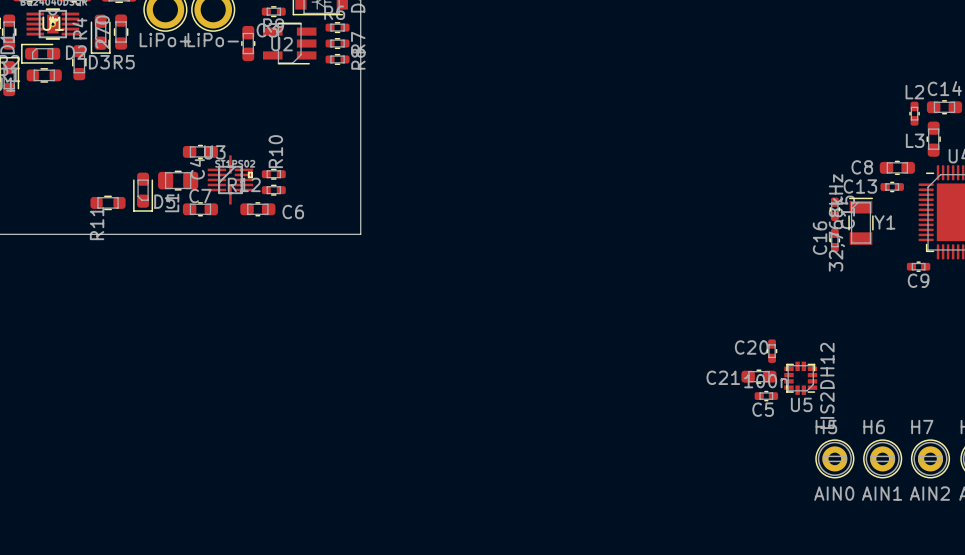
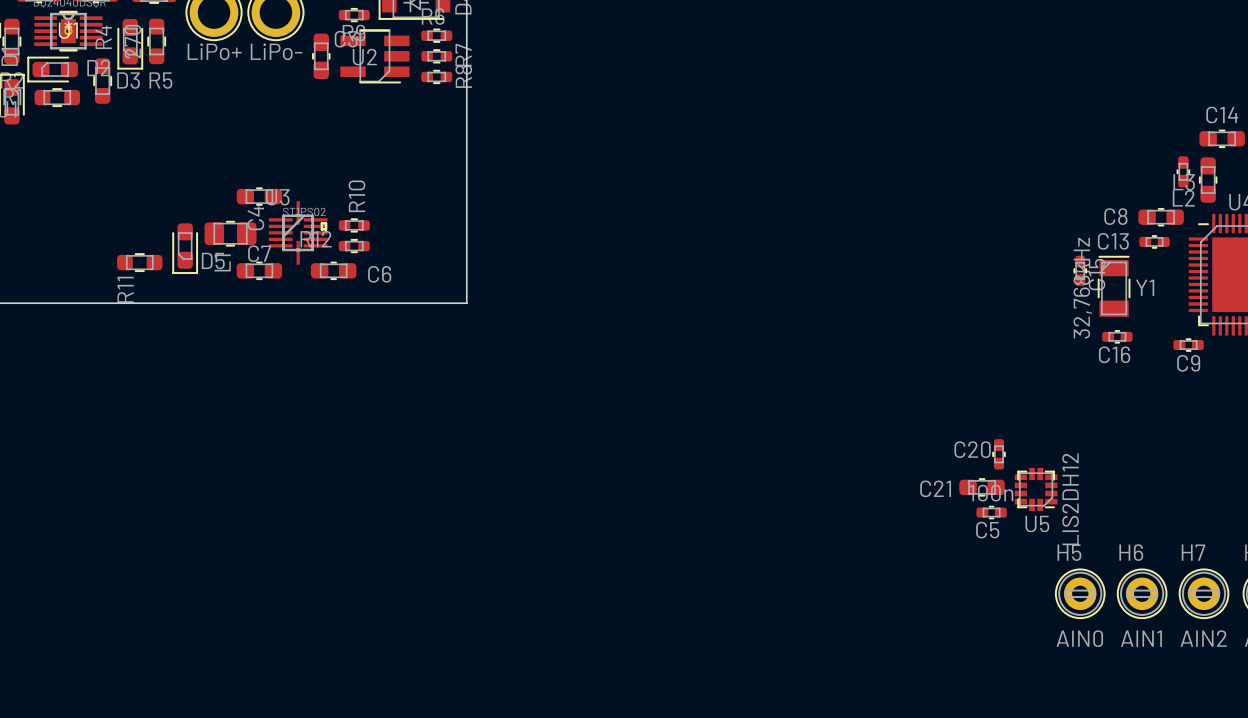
L2 name position: L2 (914, 92) -> L2 (1183, 198)
L2 position: (914, 113) -> (1183, 171)
C16 rotation: 0° (834, 240) -> 90° clockwise (1117, 336)
C16 position: (834, 240) -> (1117, 336)

